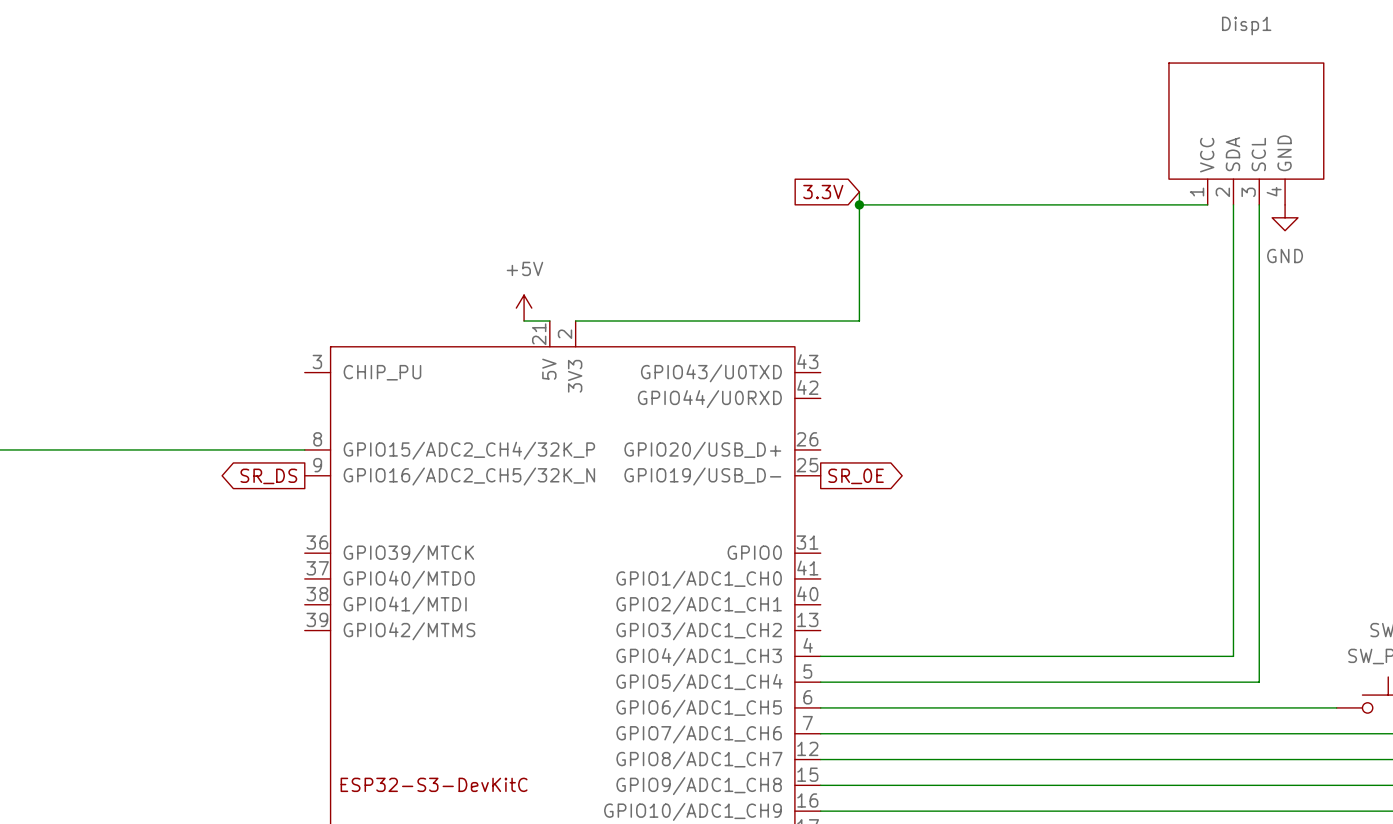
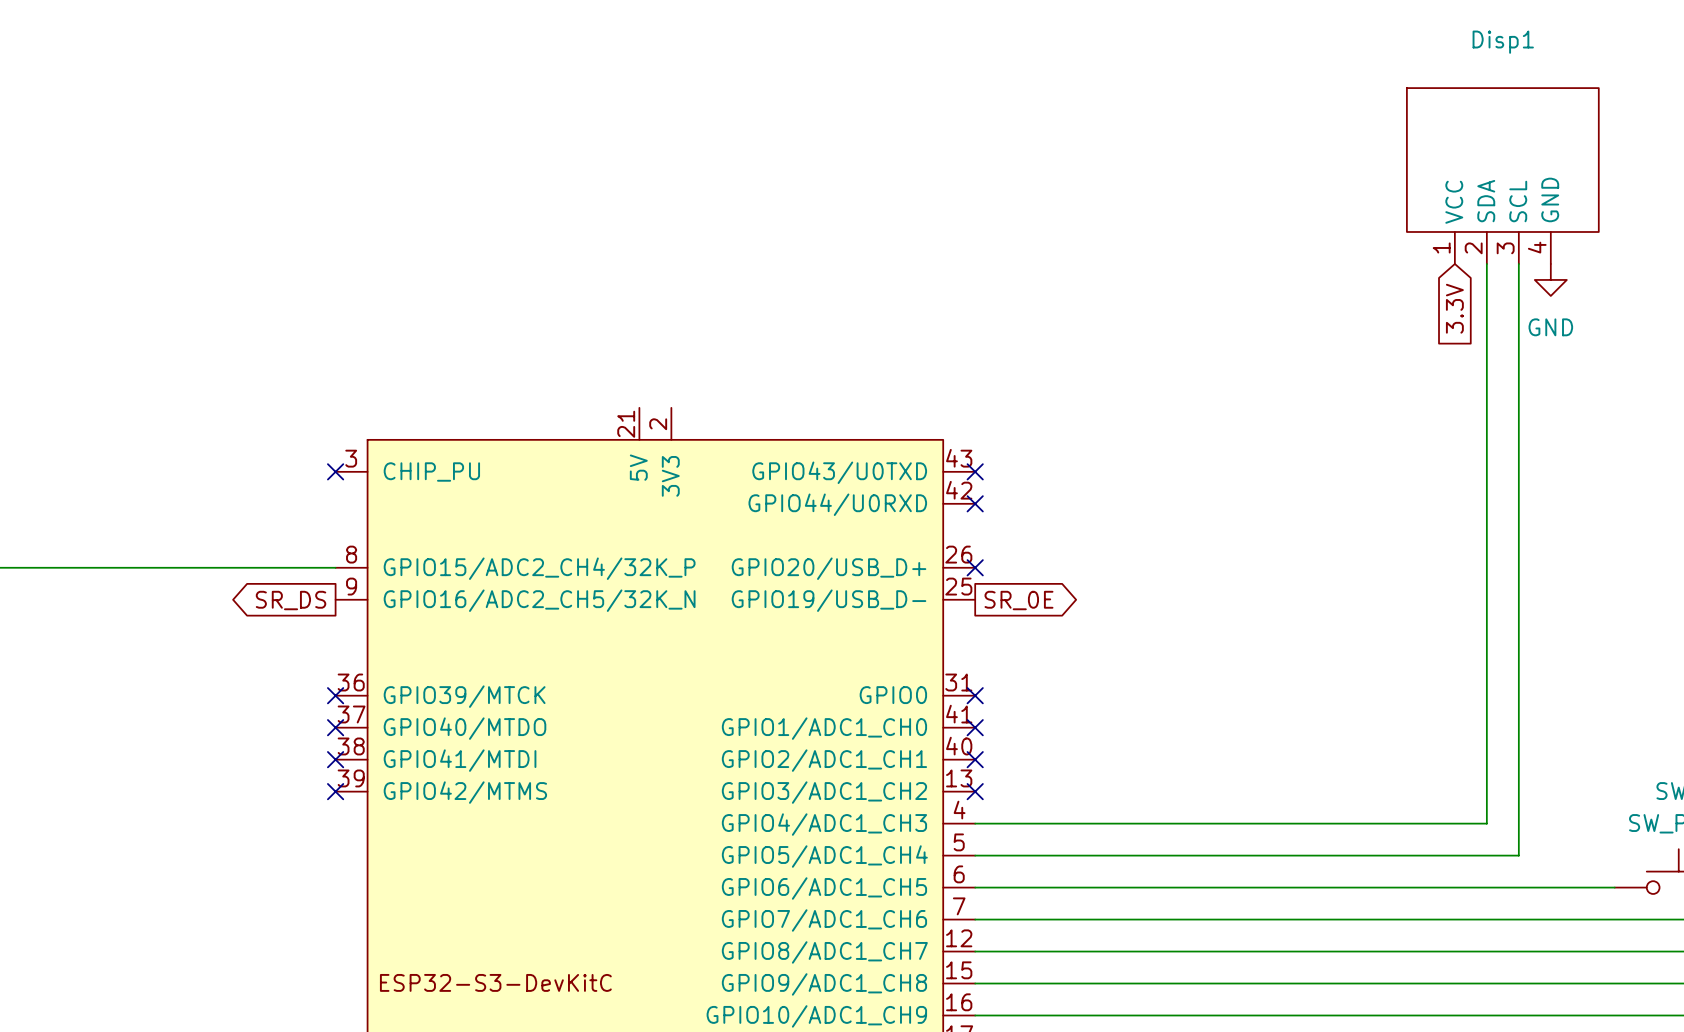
global label: 3.3V (823, 192) -> none
wire: (859, 192) (859, 321) (575, 321) -> none
wire: (859, 204) (1207, 204) -> none
junction: (859, 204) -> none
global label: none -> 3.3V (1454, 308)
power symbol: +5V (524, 308) -> none
wire: (524, 321) (549, 321) -> none
no-connect mark: none -> (335, 471)
no-connect mark: none -> (975, 471)
no-connect mark: none -> (975, 503)
no-connect mark: none -> (975, 567)
no-connect mark: none -> (335, 695)
no-connect mark: none -> (975, 695)
no-connect mark: none -> (335, 727)
no-connect mark: none -> (975, 727)
no-connect mark: none -> (335, 759)
no-connect mark: none -> (975, 759)
no-connect mark: none -> (335, 791)
no-connect mark: none -> (975, 791)

